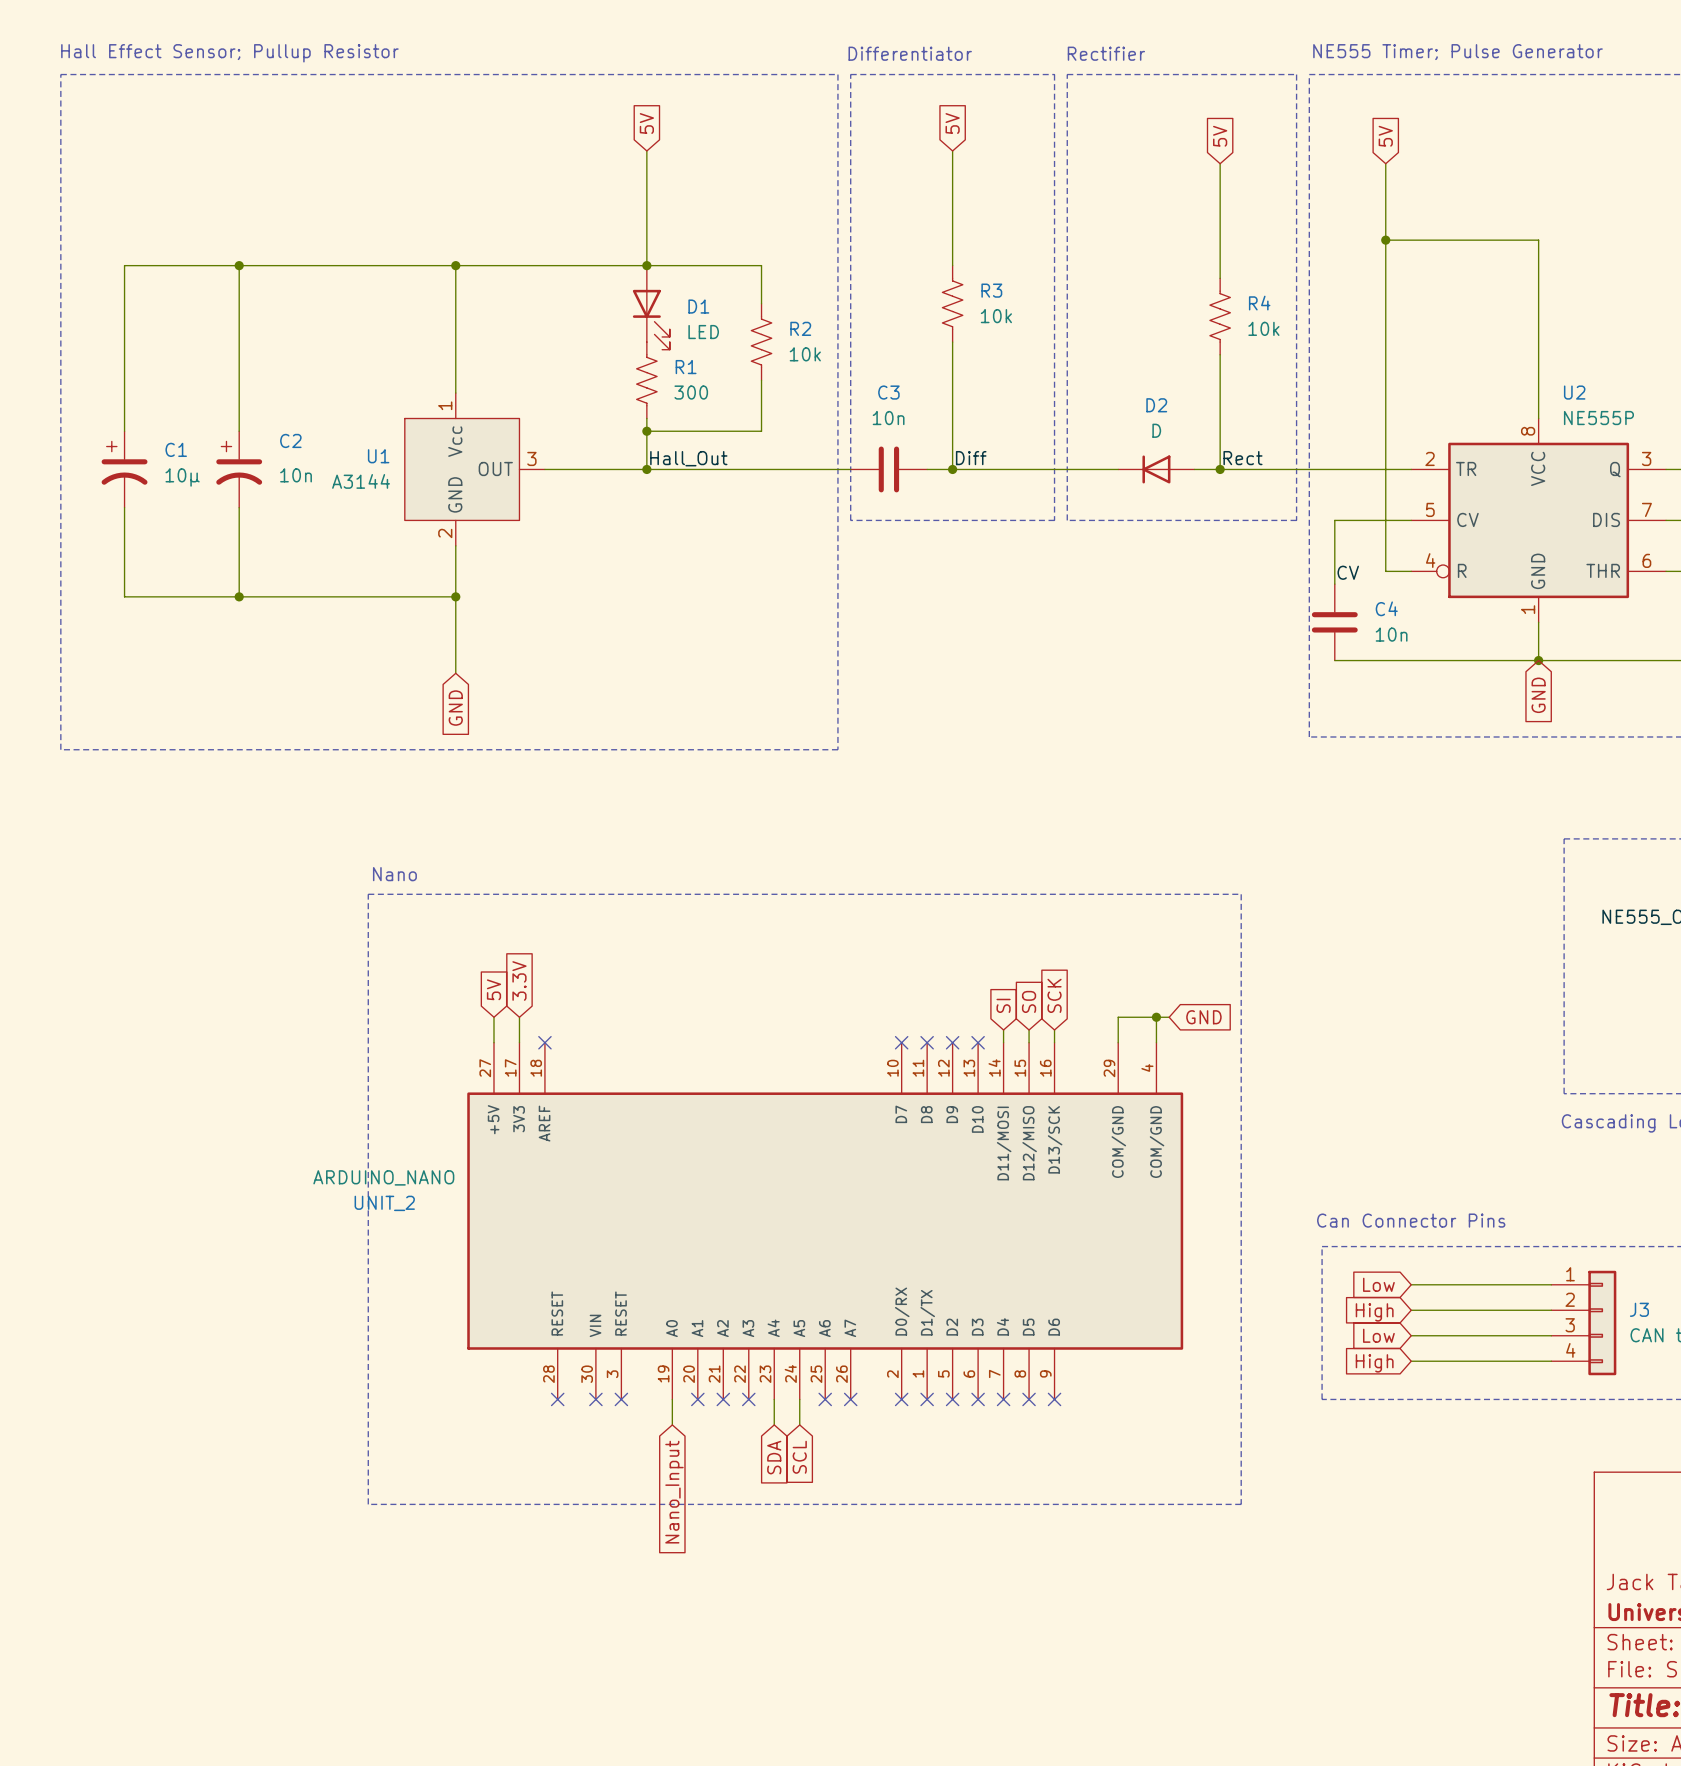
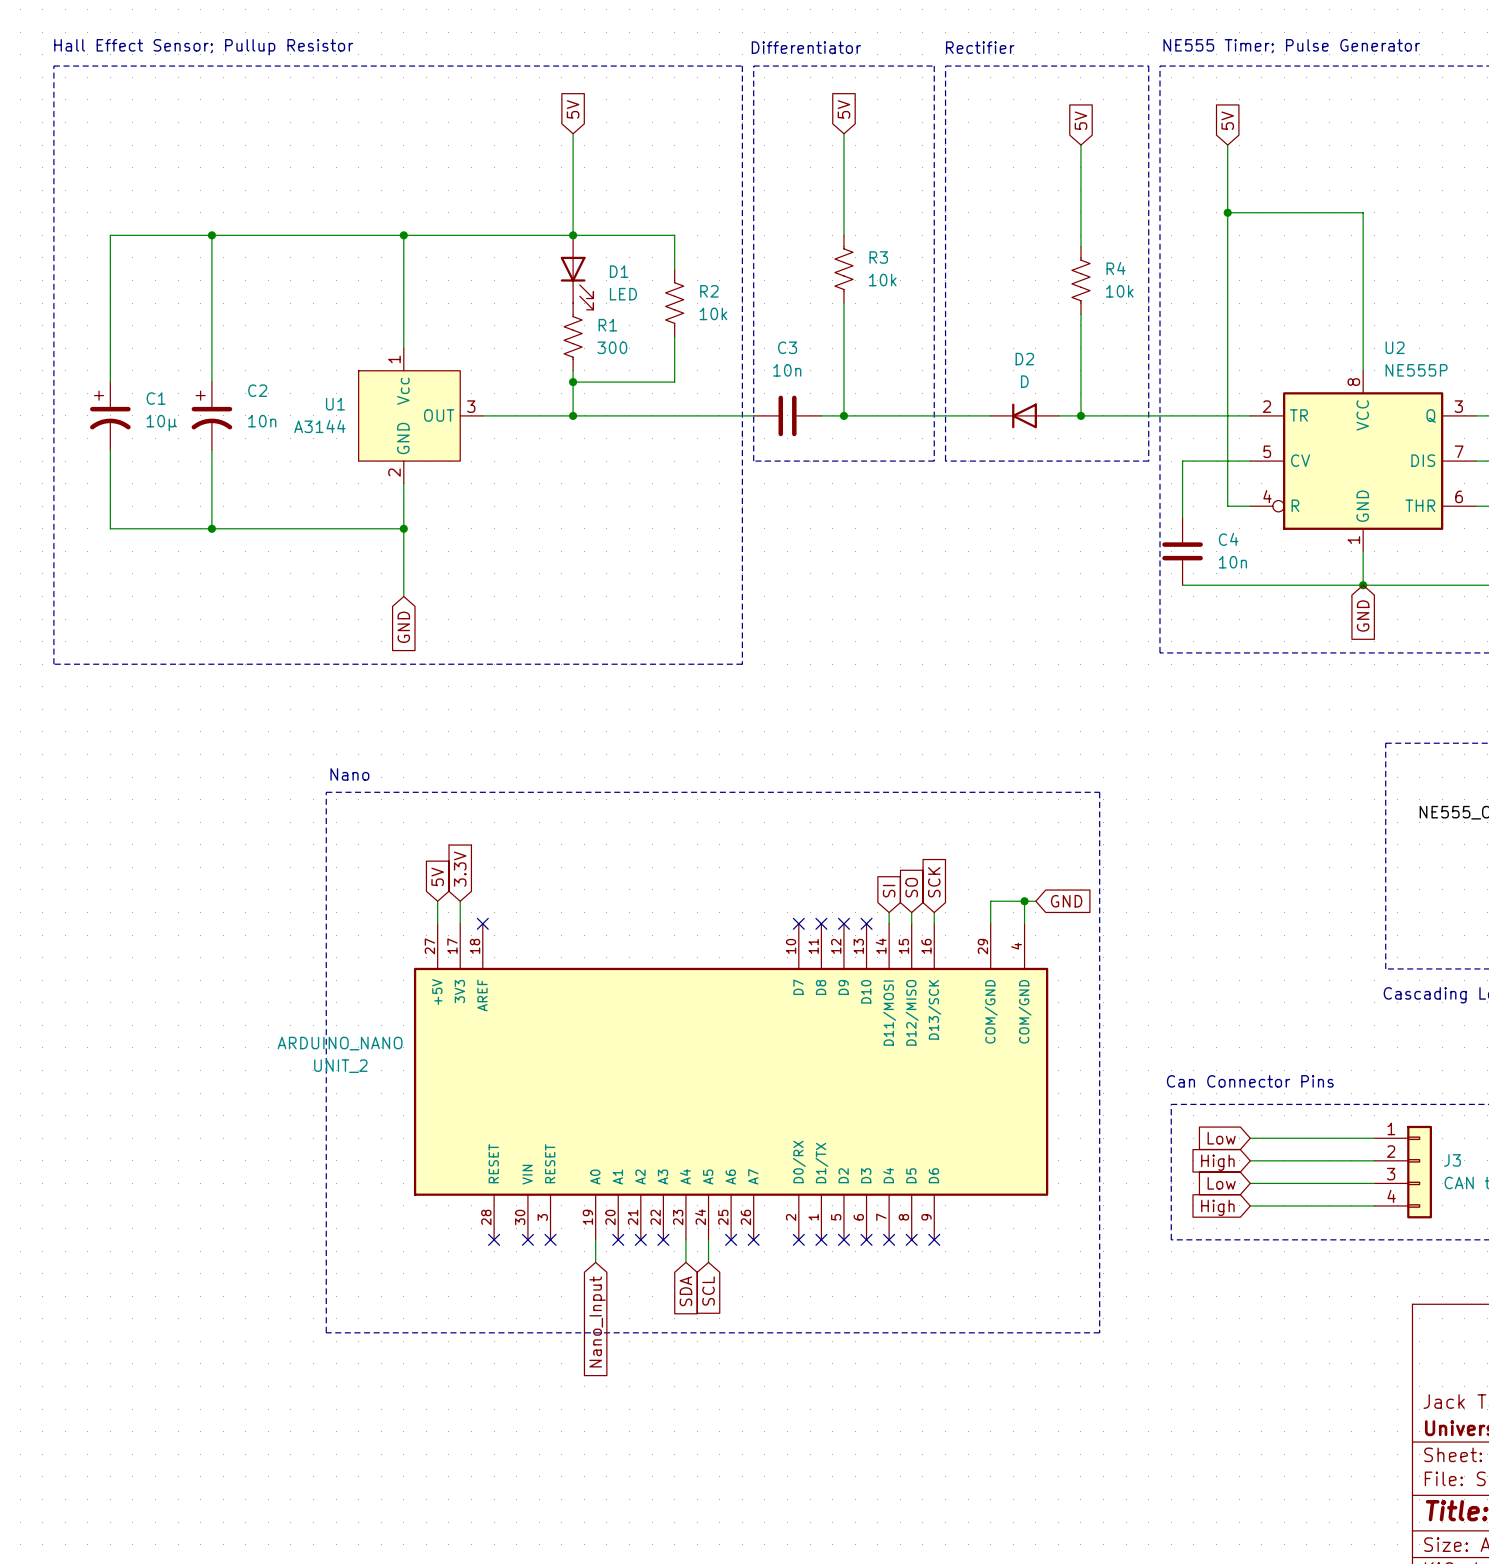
label: Hall_Out (688, 458) -> none
label: Diff (971, 458) -> none
label: Rect (1242, 458) -> none
label: CV (1348, 572) -> none

